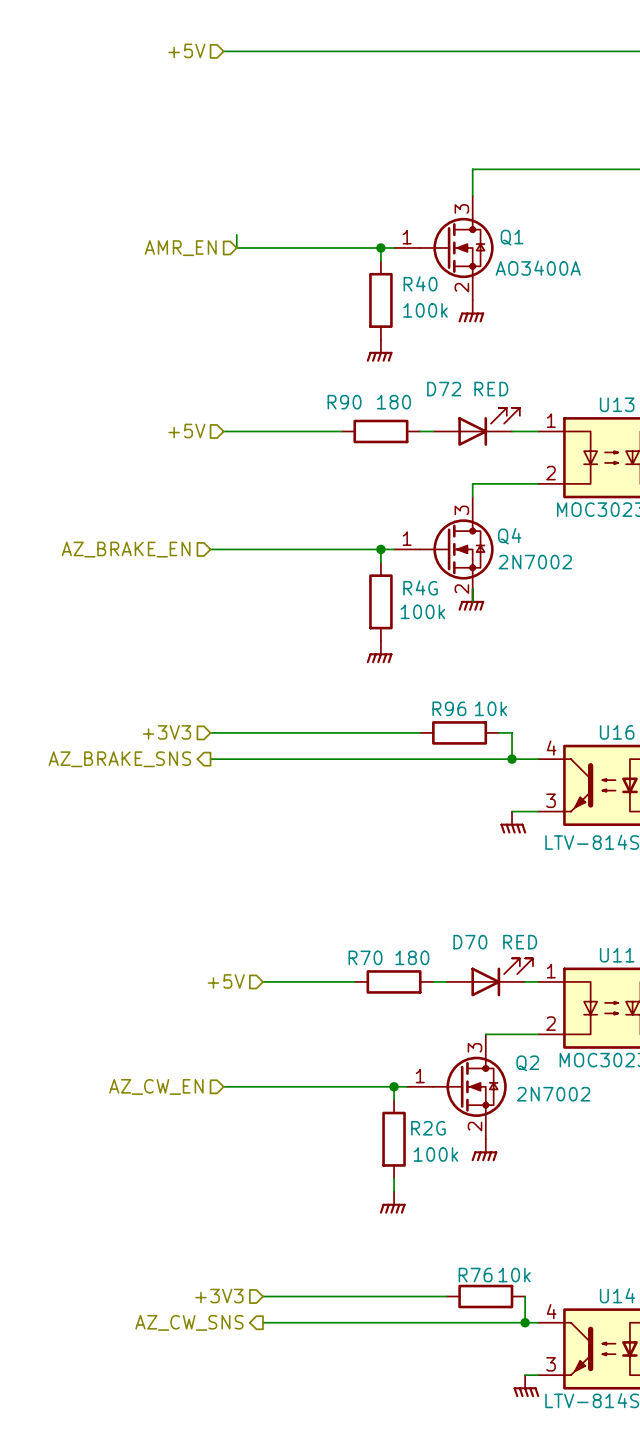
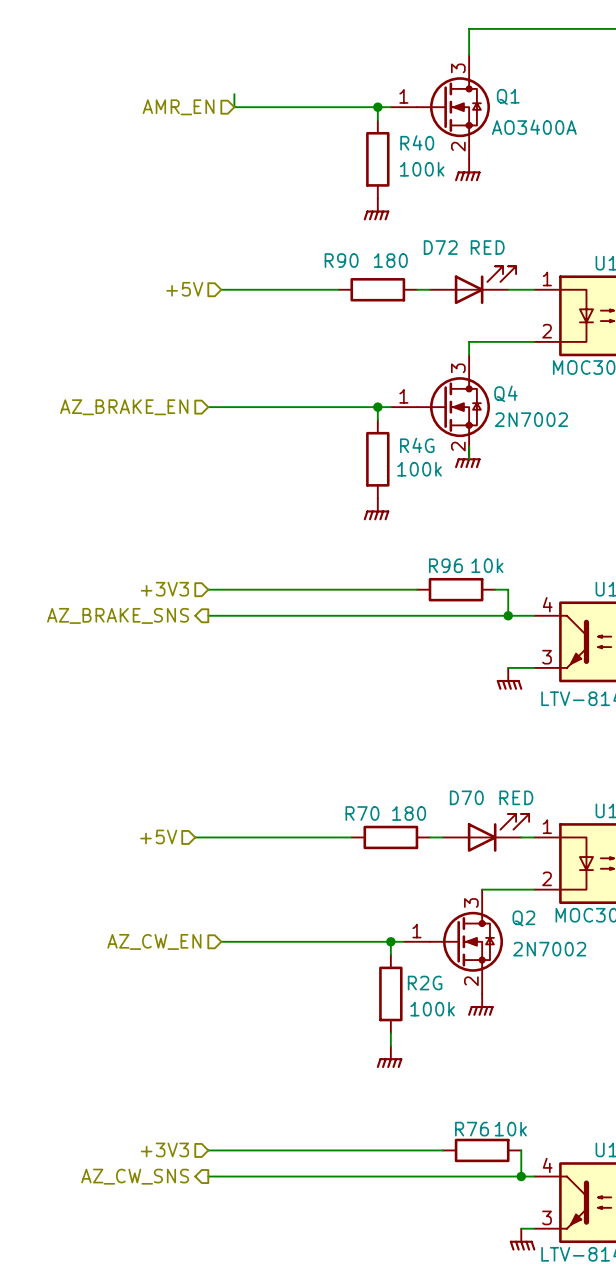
wire: none -> (195, 837) (260, 837)
hierarchical label position: +5V (226, 981) -> +5V (158, 836)
wire: none -> (208, 1150) (260, 1150)
hierarchical label position: +3V3 (219, 1296) -> +3V3 (164, 1149)
hierarchical label position: AZ_CW_SNS (189, 1322) -> AZ_CW_SNS (135, 1176)
wire: none -> (208, 1176) (260, 1176)

